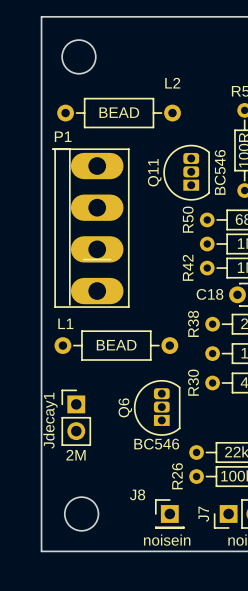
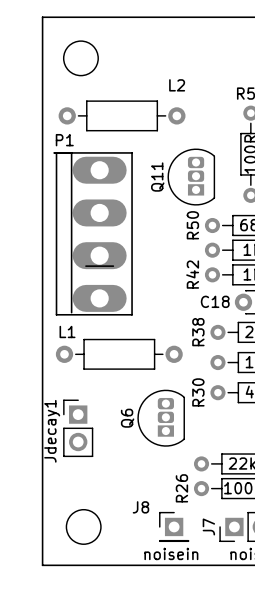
L2 value: BEAD (119, 112) -> none
Q11 value: BC546 (220, 172) -> none
L1 value: BEAD (116, 345) -> none
Q6 value: BC546 (156, 444) -> none
Jdecay1 value: 2M (76, 455) -> none

